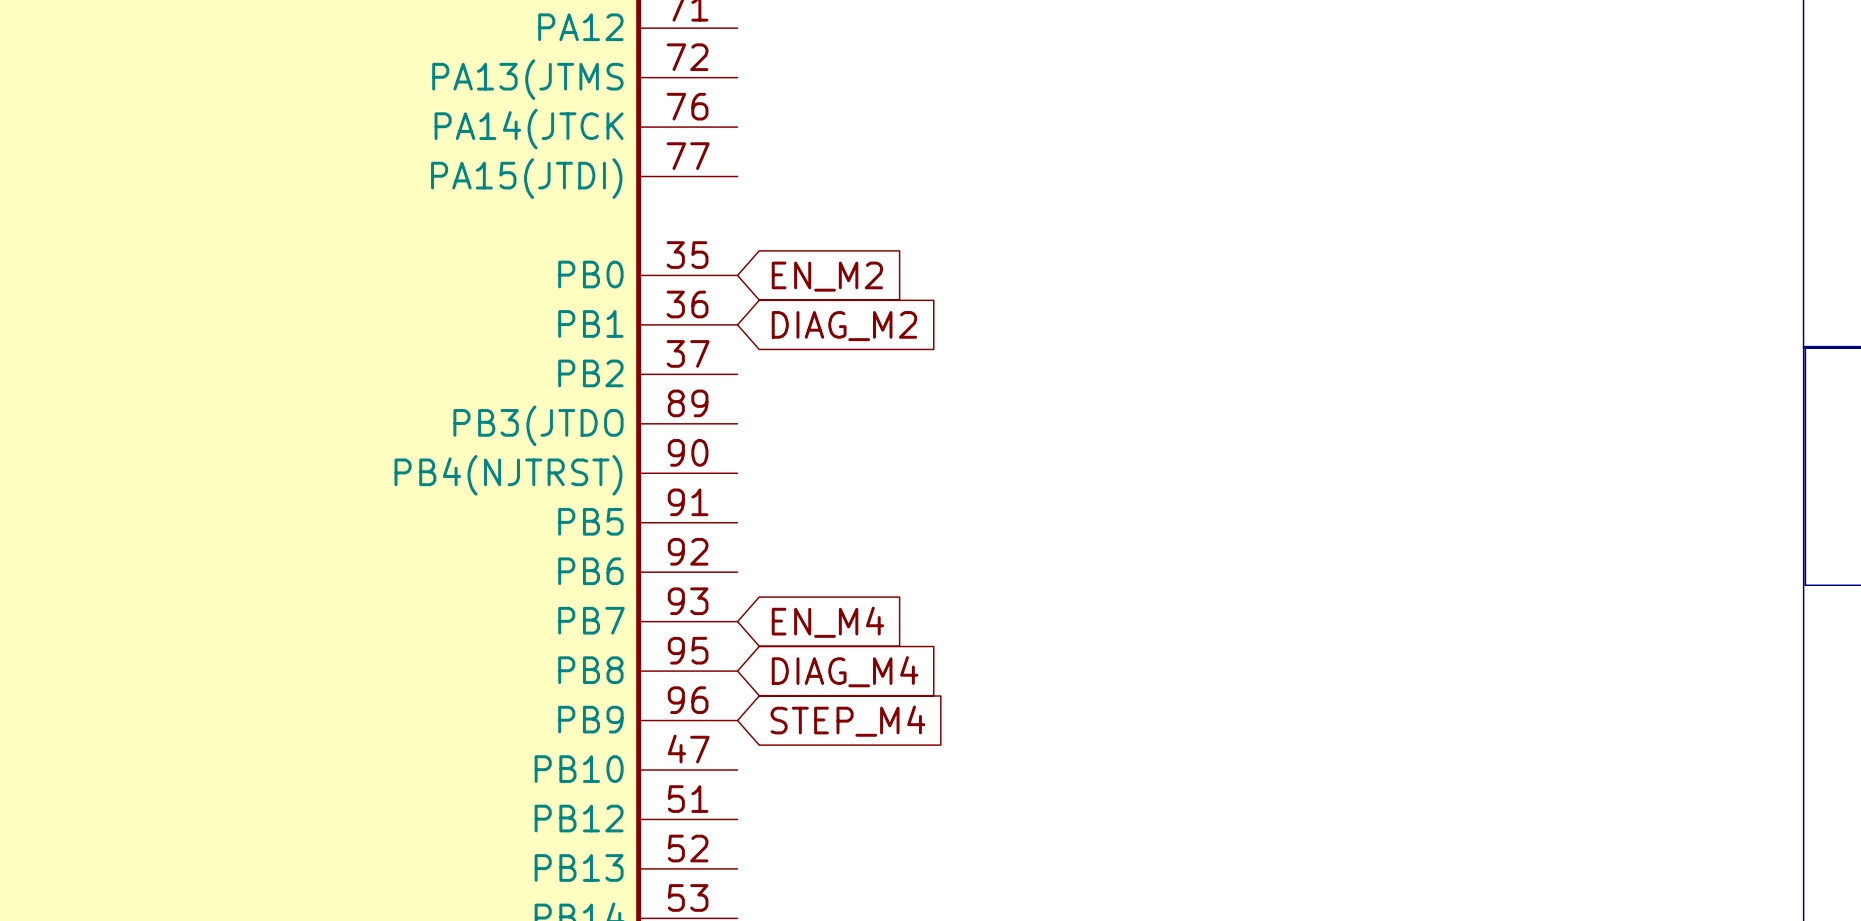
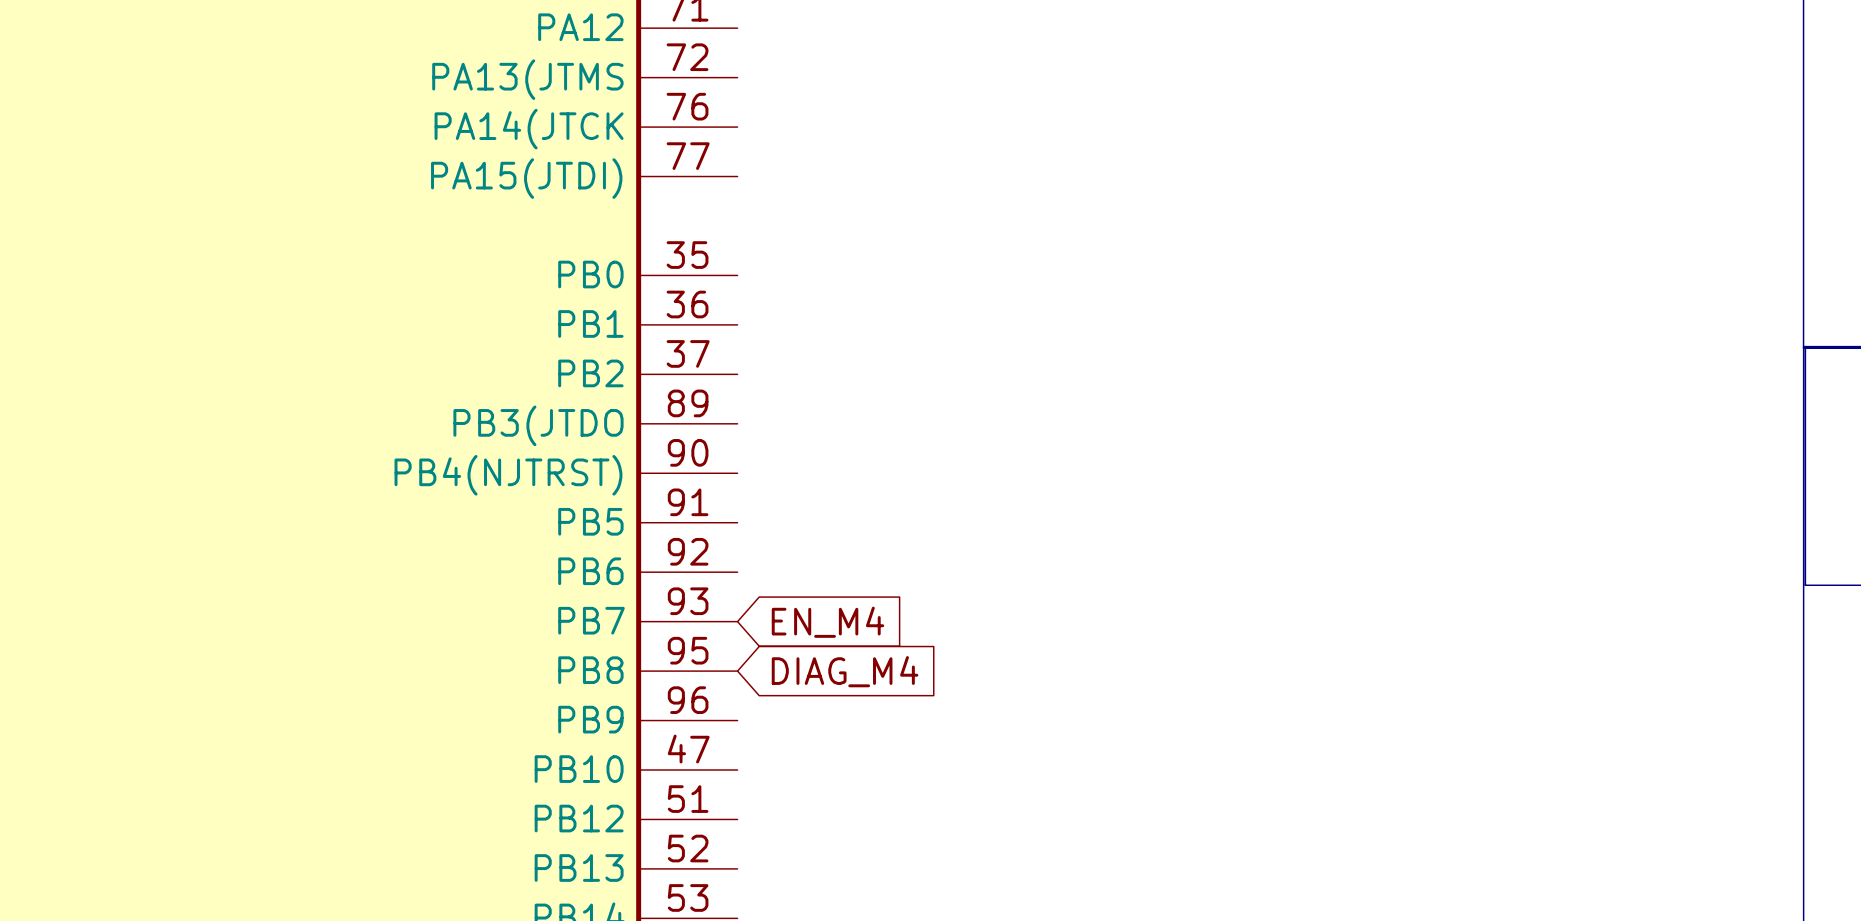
global label: EN_M2 (827, 276) -> none
global label: DIAG_M2 (844, 326) -> none
global label: STEP_M4 (848, 721) -> none

